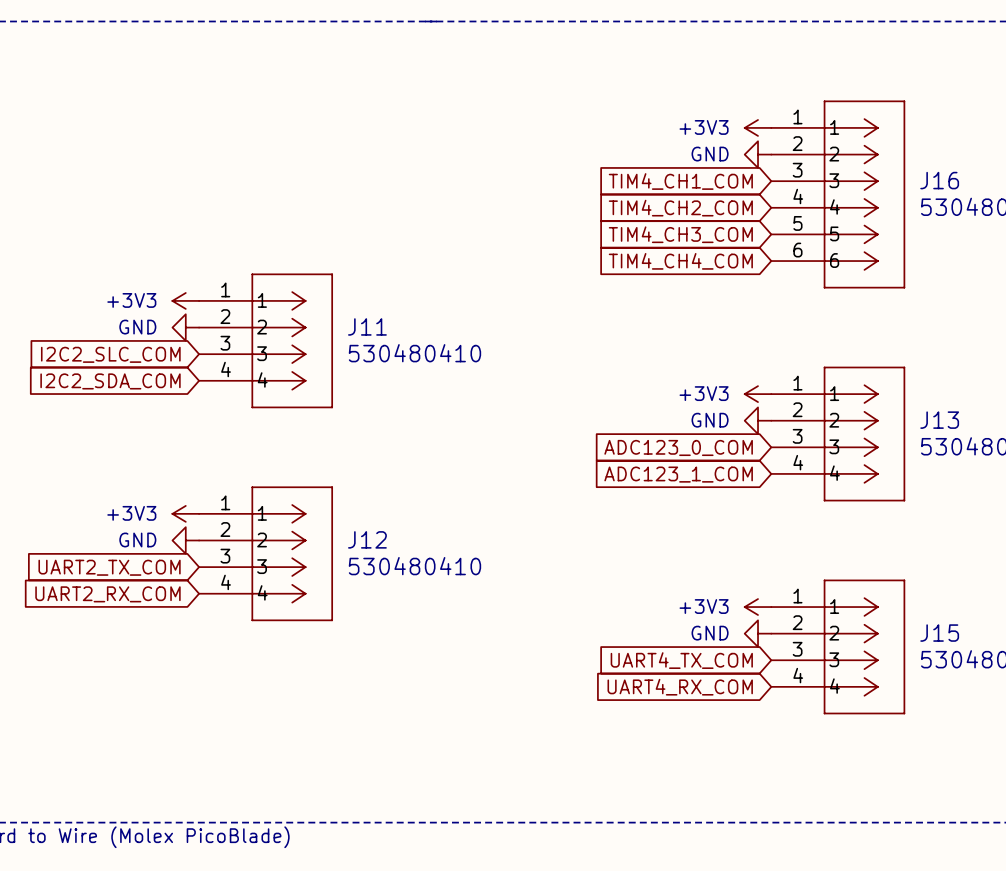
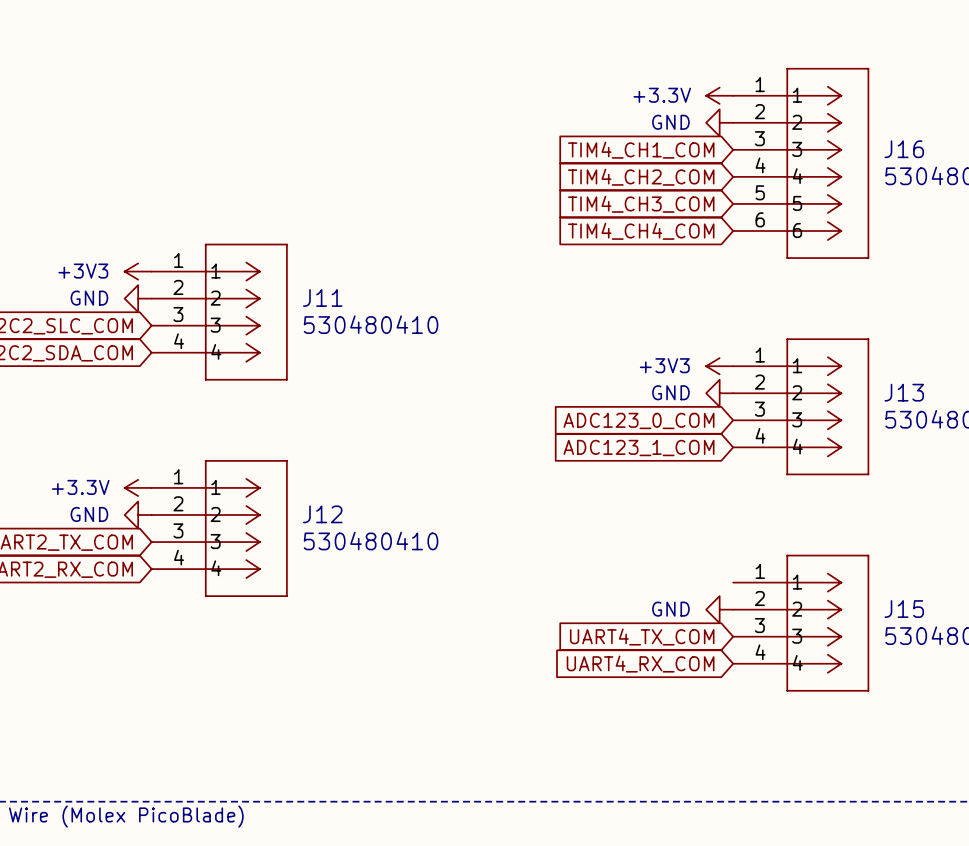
power symbol: +3V3 (758, 127) -> +3.3V (719, 95)
power symbol: +3V3 (185, 513) -> +3.3V (138, 487)
power symbol: +3V3 (758, 607) -> none

